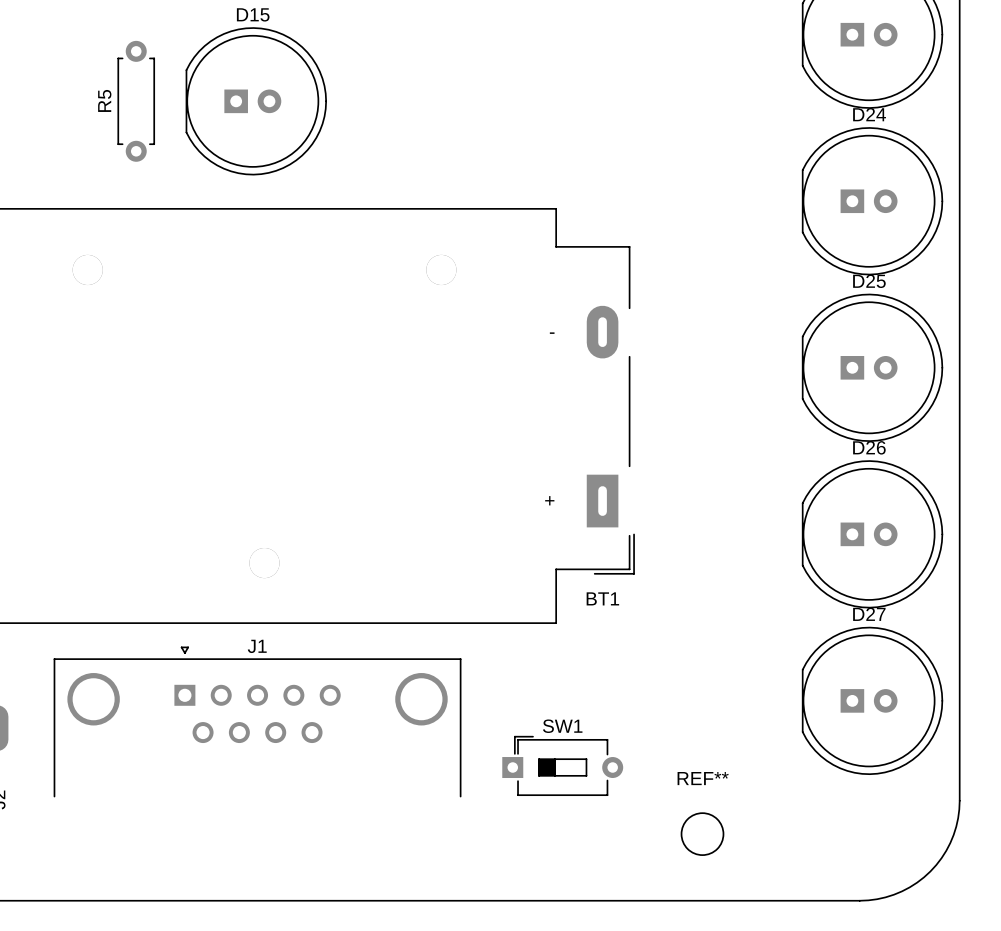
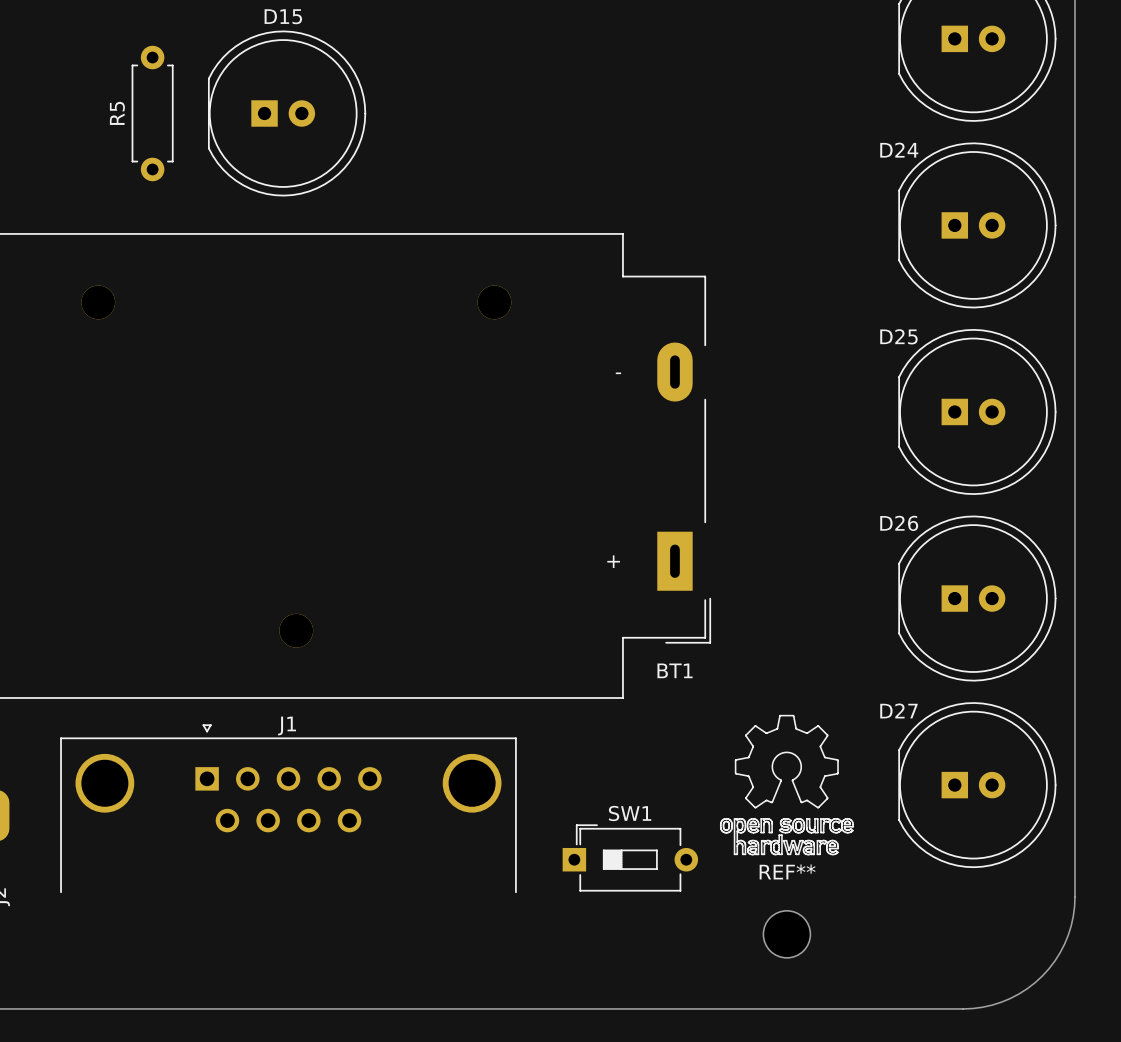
D24 name position: D24 (869, 114) -> D24 (899, 150)
D25 name position: D25 (869, 281) -> D25 (898, 336)
D26 name position: D26 (869, 447) -> D26 (899, 523)
D27 name position: D27 (869, 614) -> D27 (898, 710)
drawing: none -> [720, 714, 854, 856]

